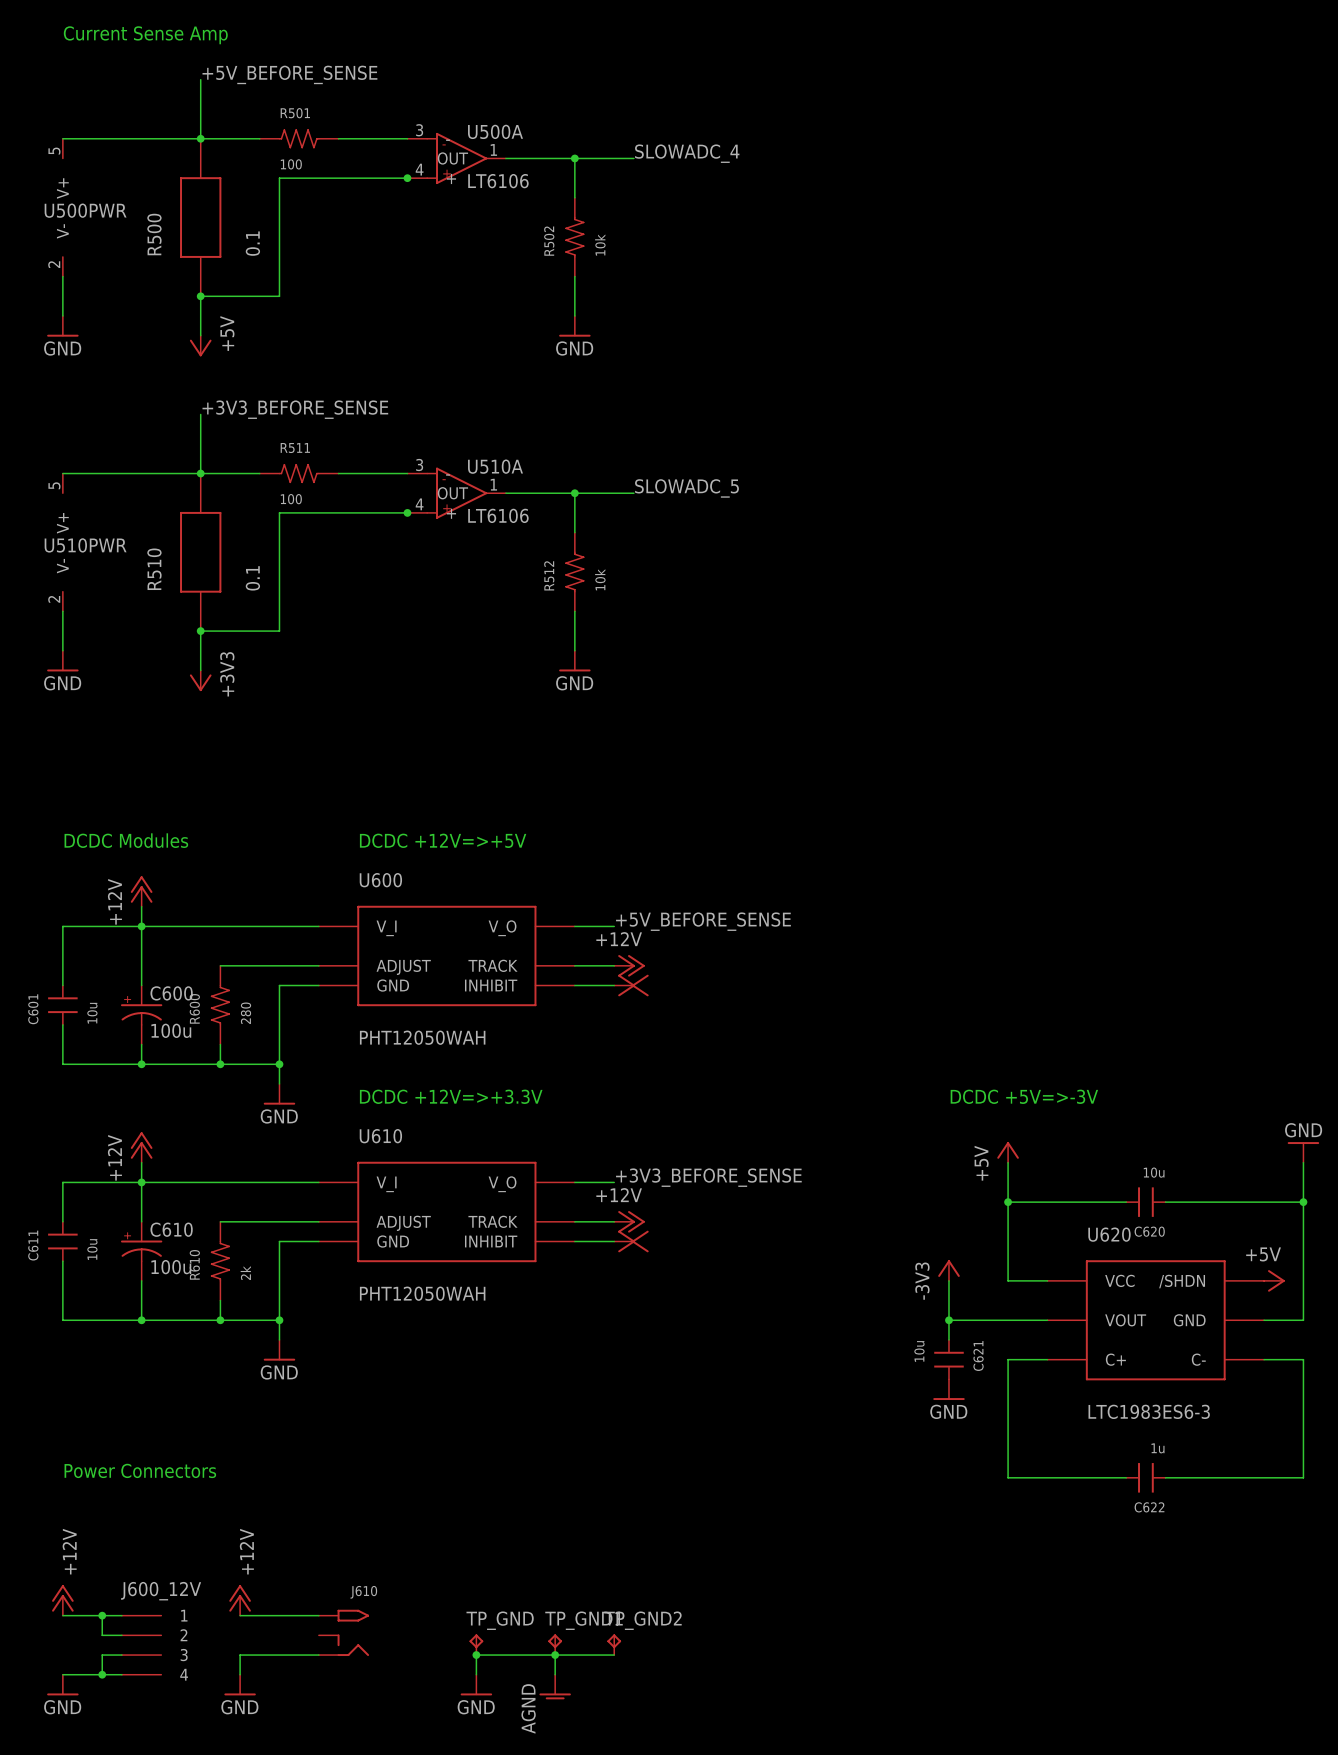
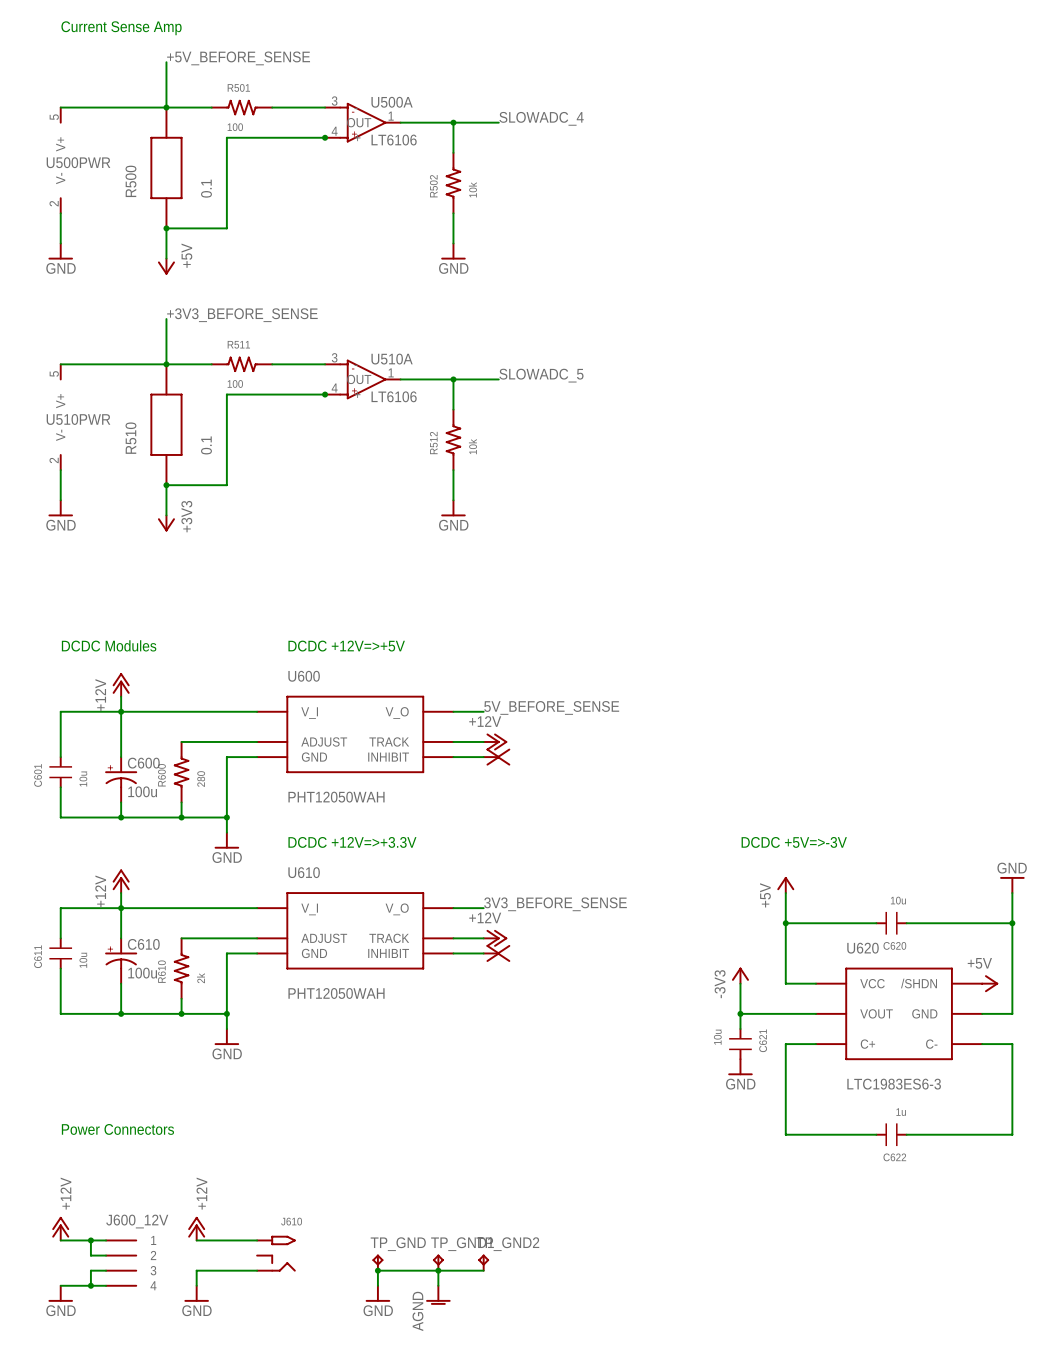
label: +5V_BEFORE_SENSE (703, 921) -> 5V_BEFORE_SENSE (551, 707)
label: +3V3_BEFORE_SENSE (708, 1177) -> 3V3_BEFORE_SENSE (555, 904)

